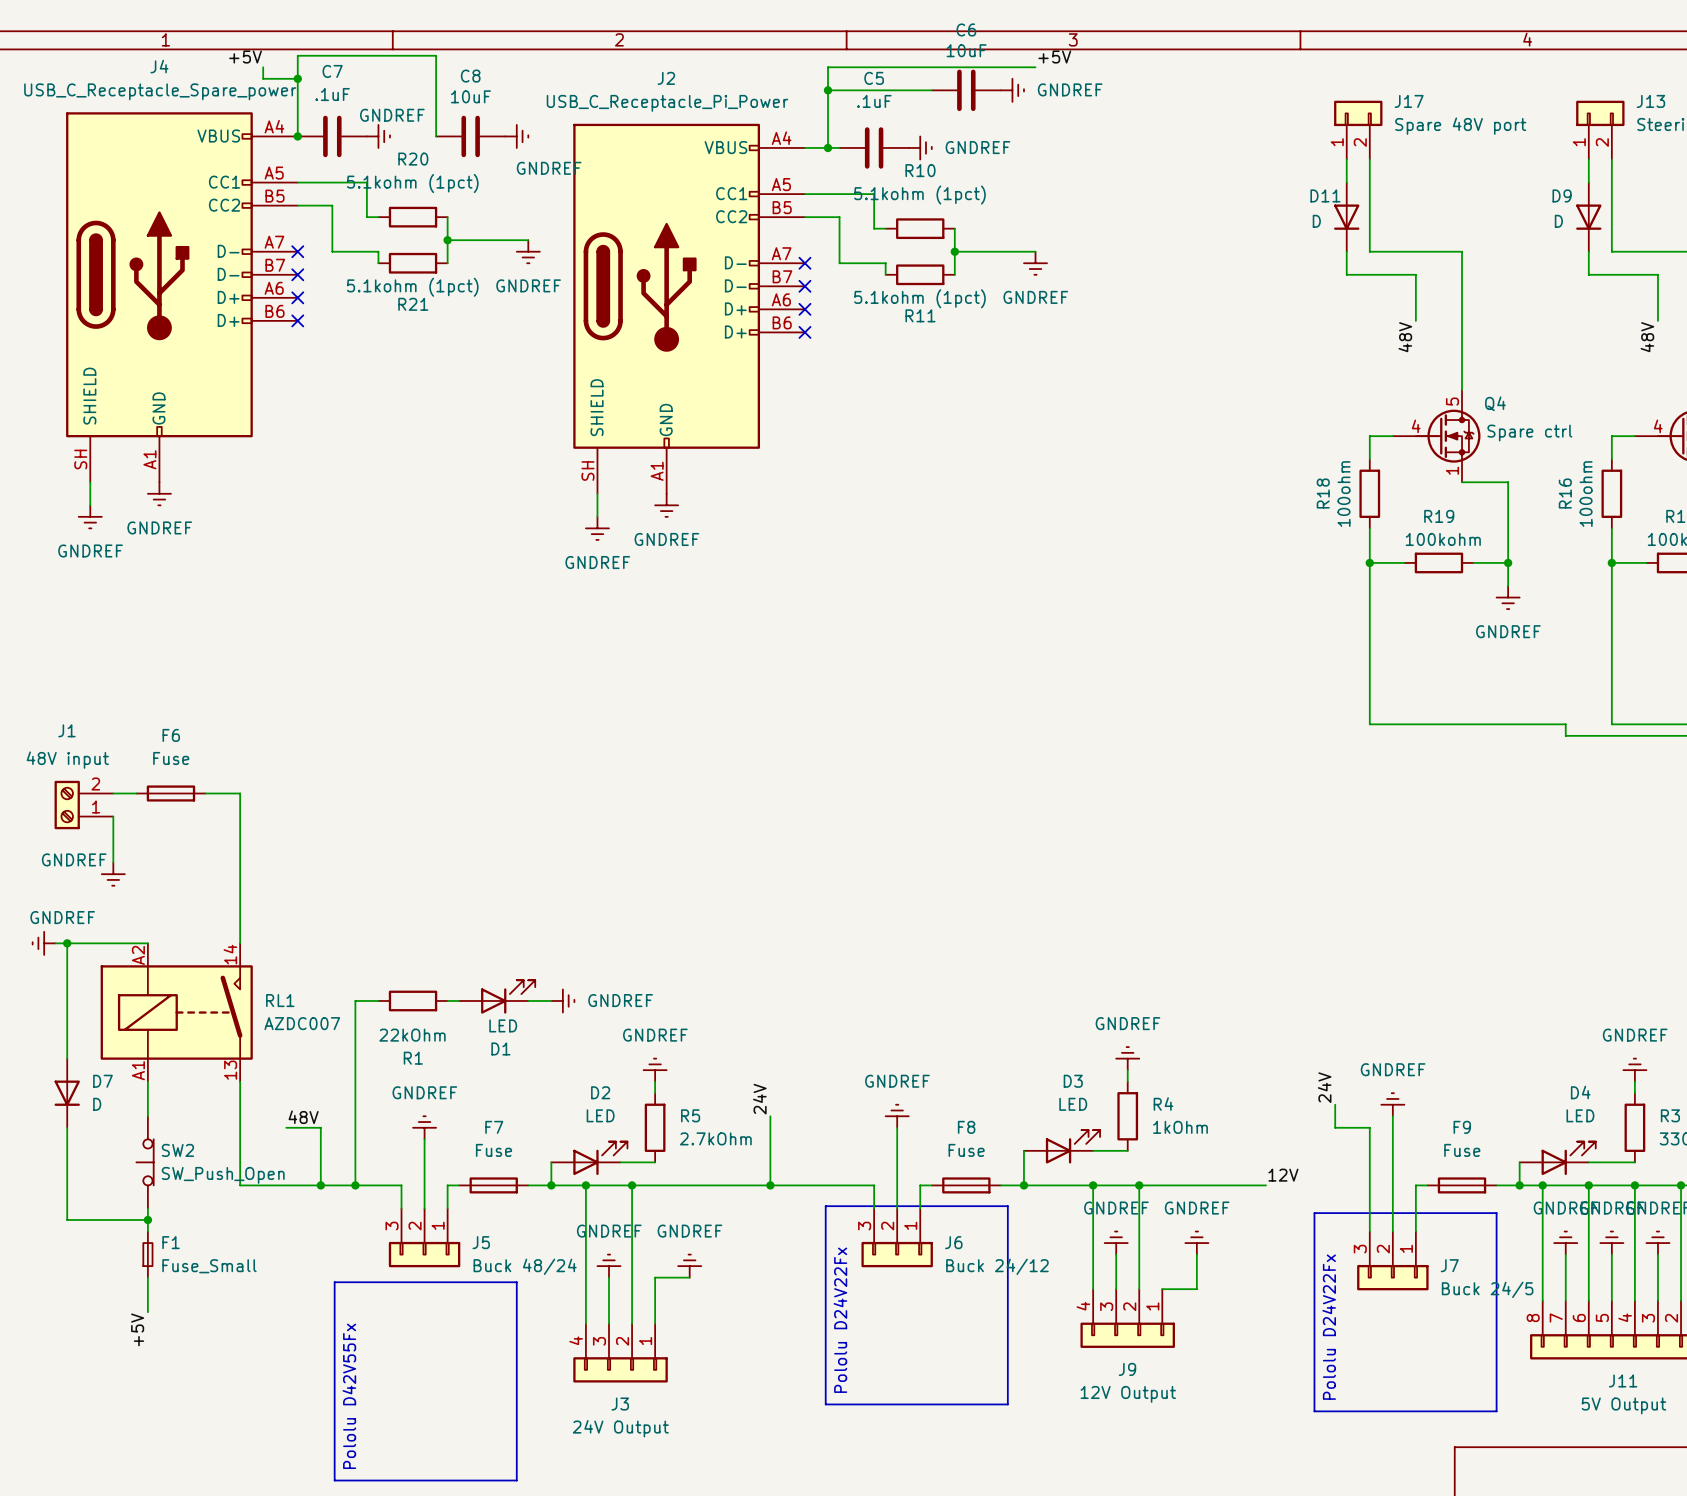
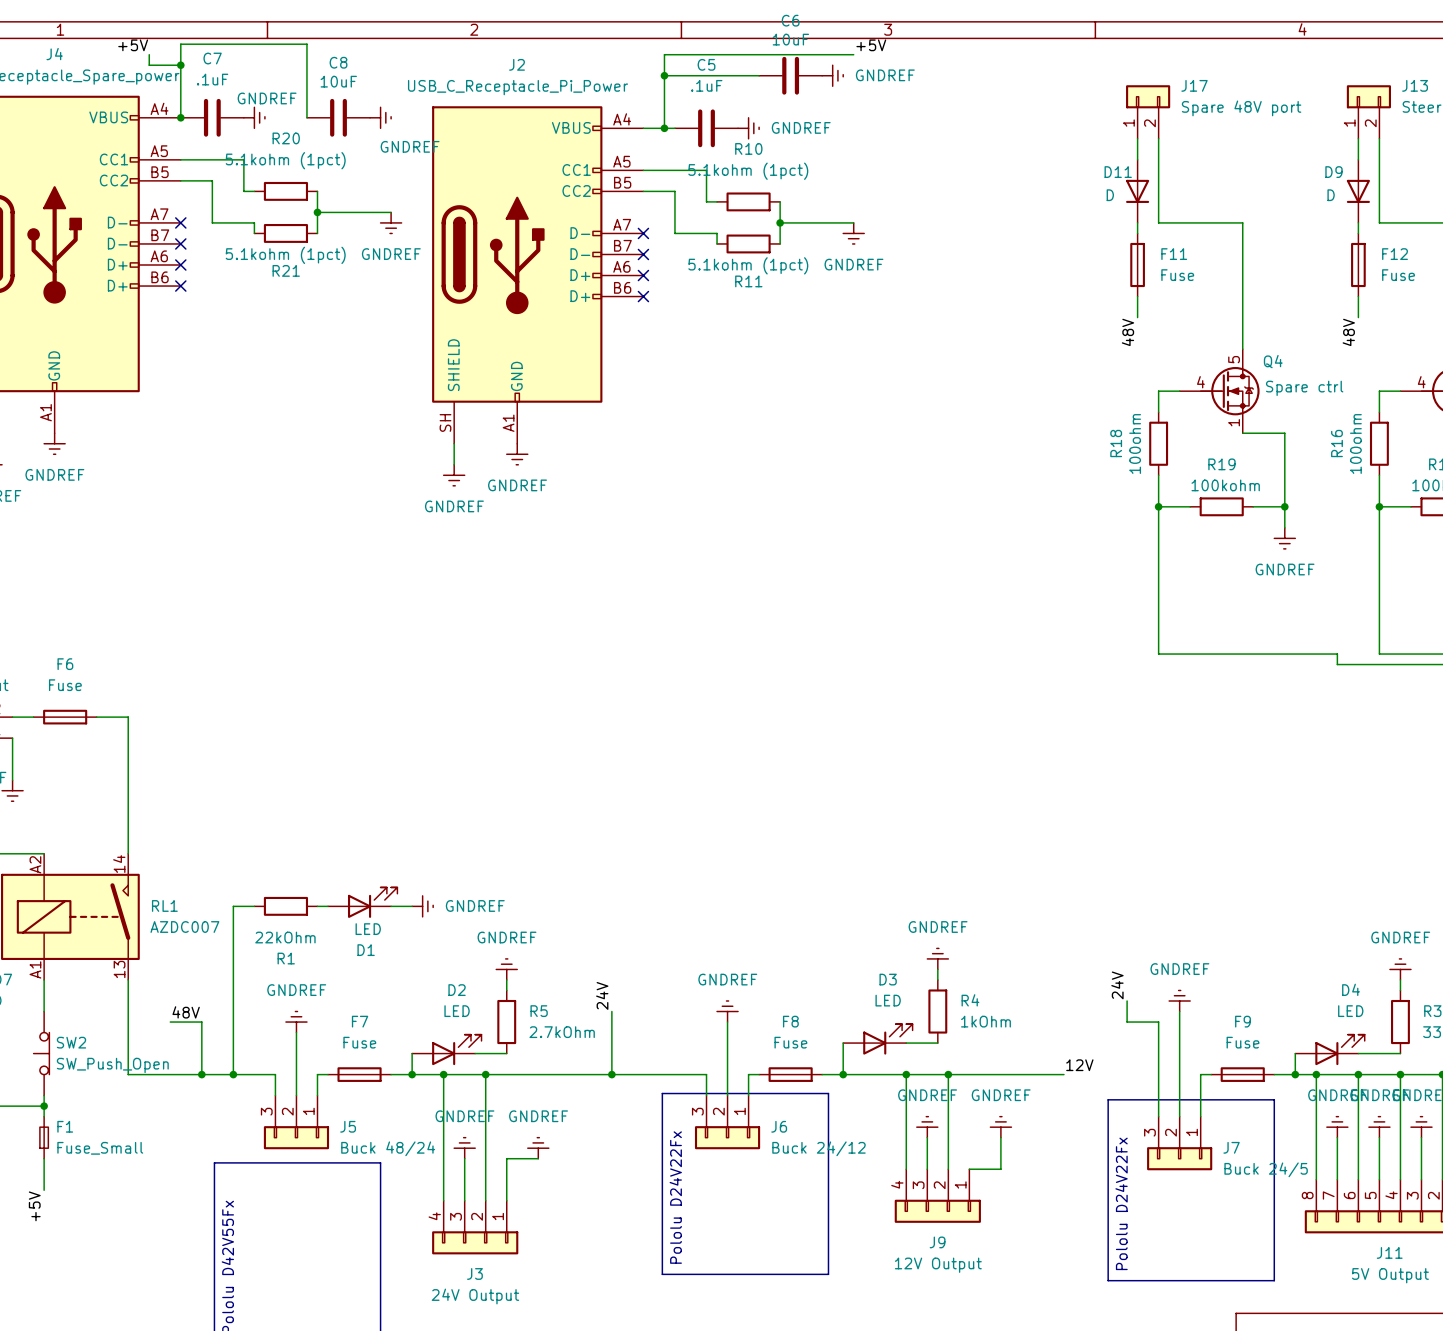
wire: (1346, 263) (1346, 274) (1415, 274) (1415, 320) -> none
wire: (1588, 263) (1588, 274) (1657, 274) (1657, 320) -> none
F11: none -> Fuse (1137, 265)
F12: none -> Fuse (1358, 265)
wire: none -> (1137, 296) (1137, 317)
wire: none -> (1358, 296) (1358, 317)
label position: 48V (1405, 337) -> 48V (1127, 332)
label position: 48V (1647, 337) -> 48V (1348, 332)

